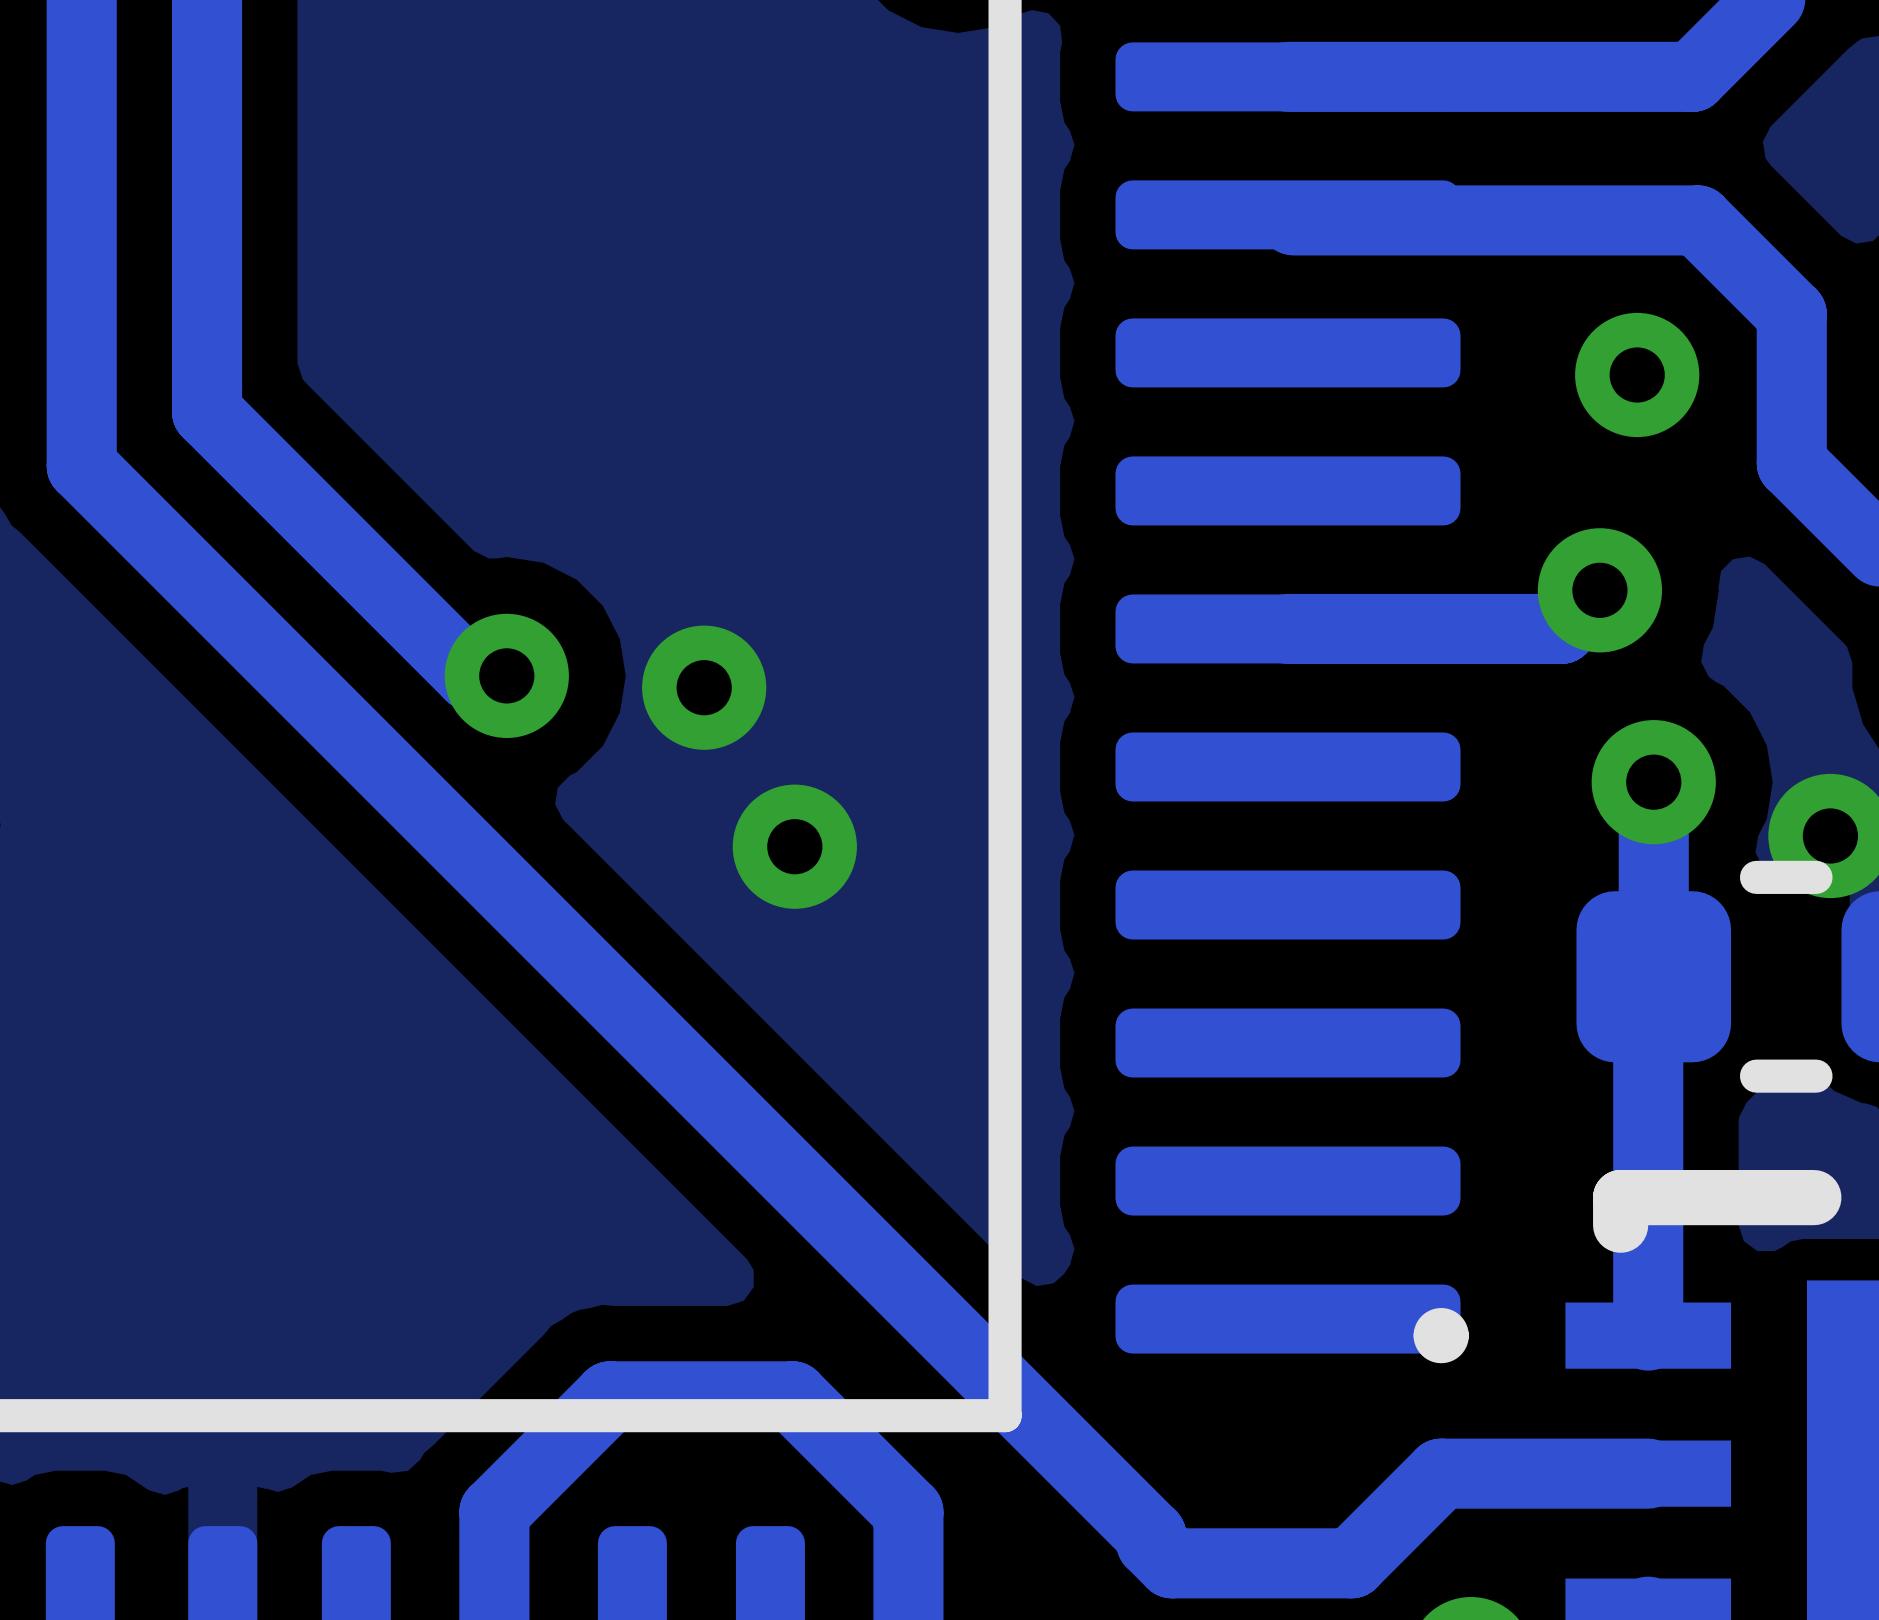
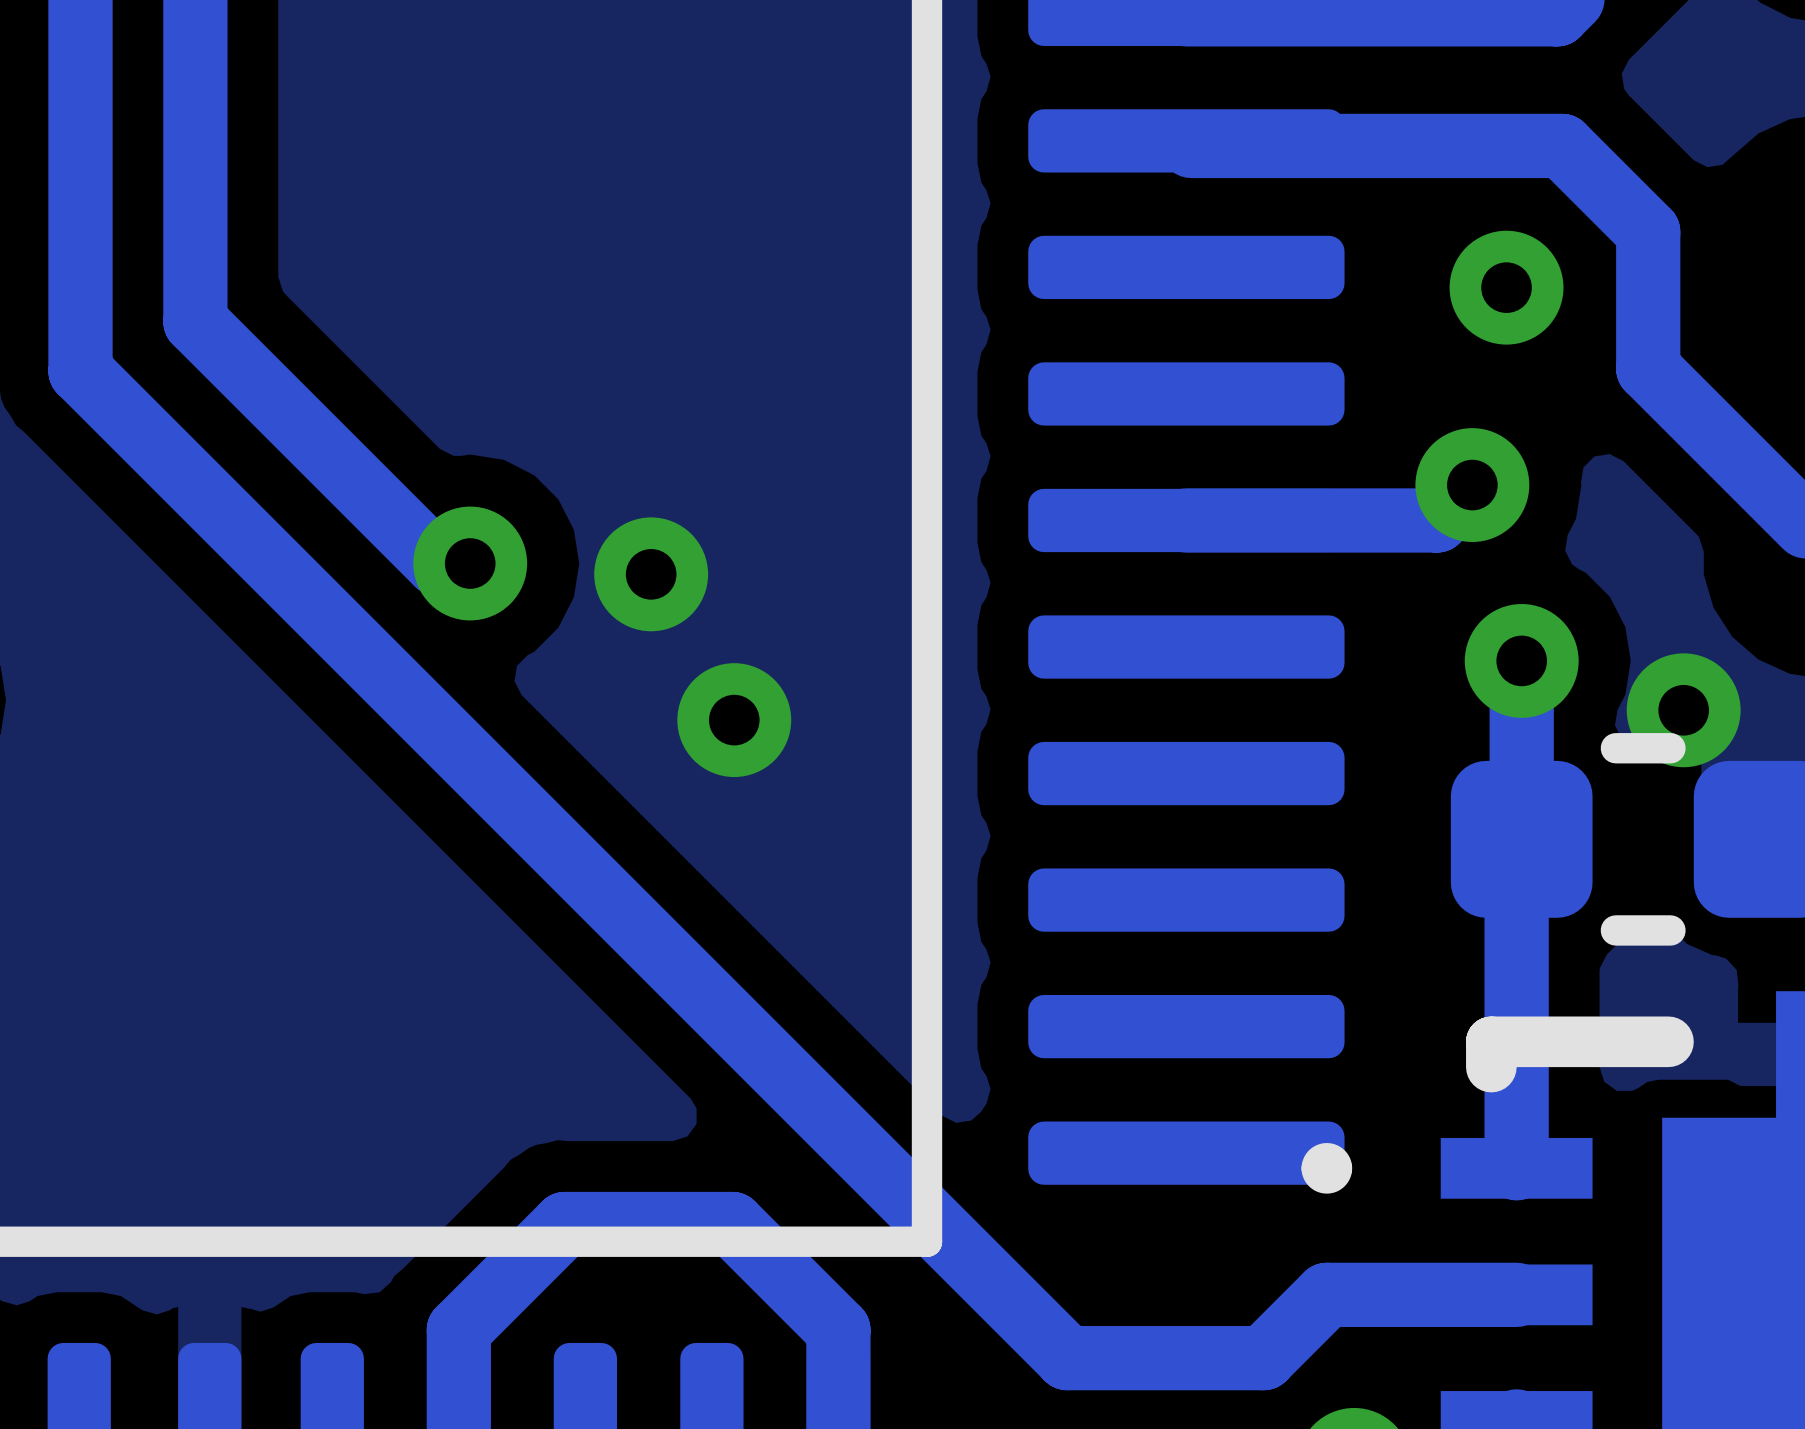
track: (1151, 1535) (1151, 1542) (1172, 1563) (1351, 1563) (1372, 1542) -> (1061, 1351) (1067, 1358) (1263, 1358)

